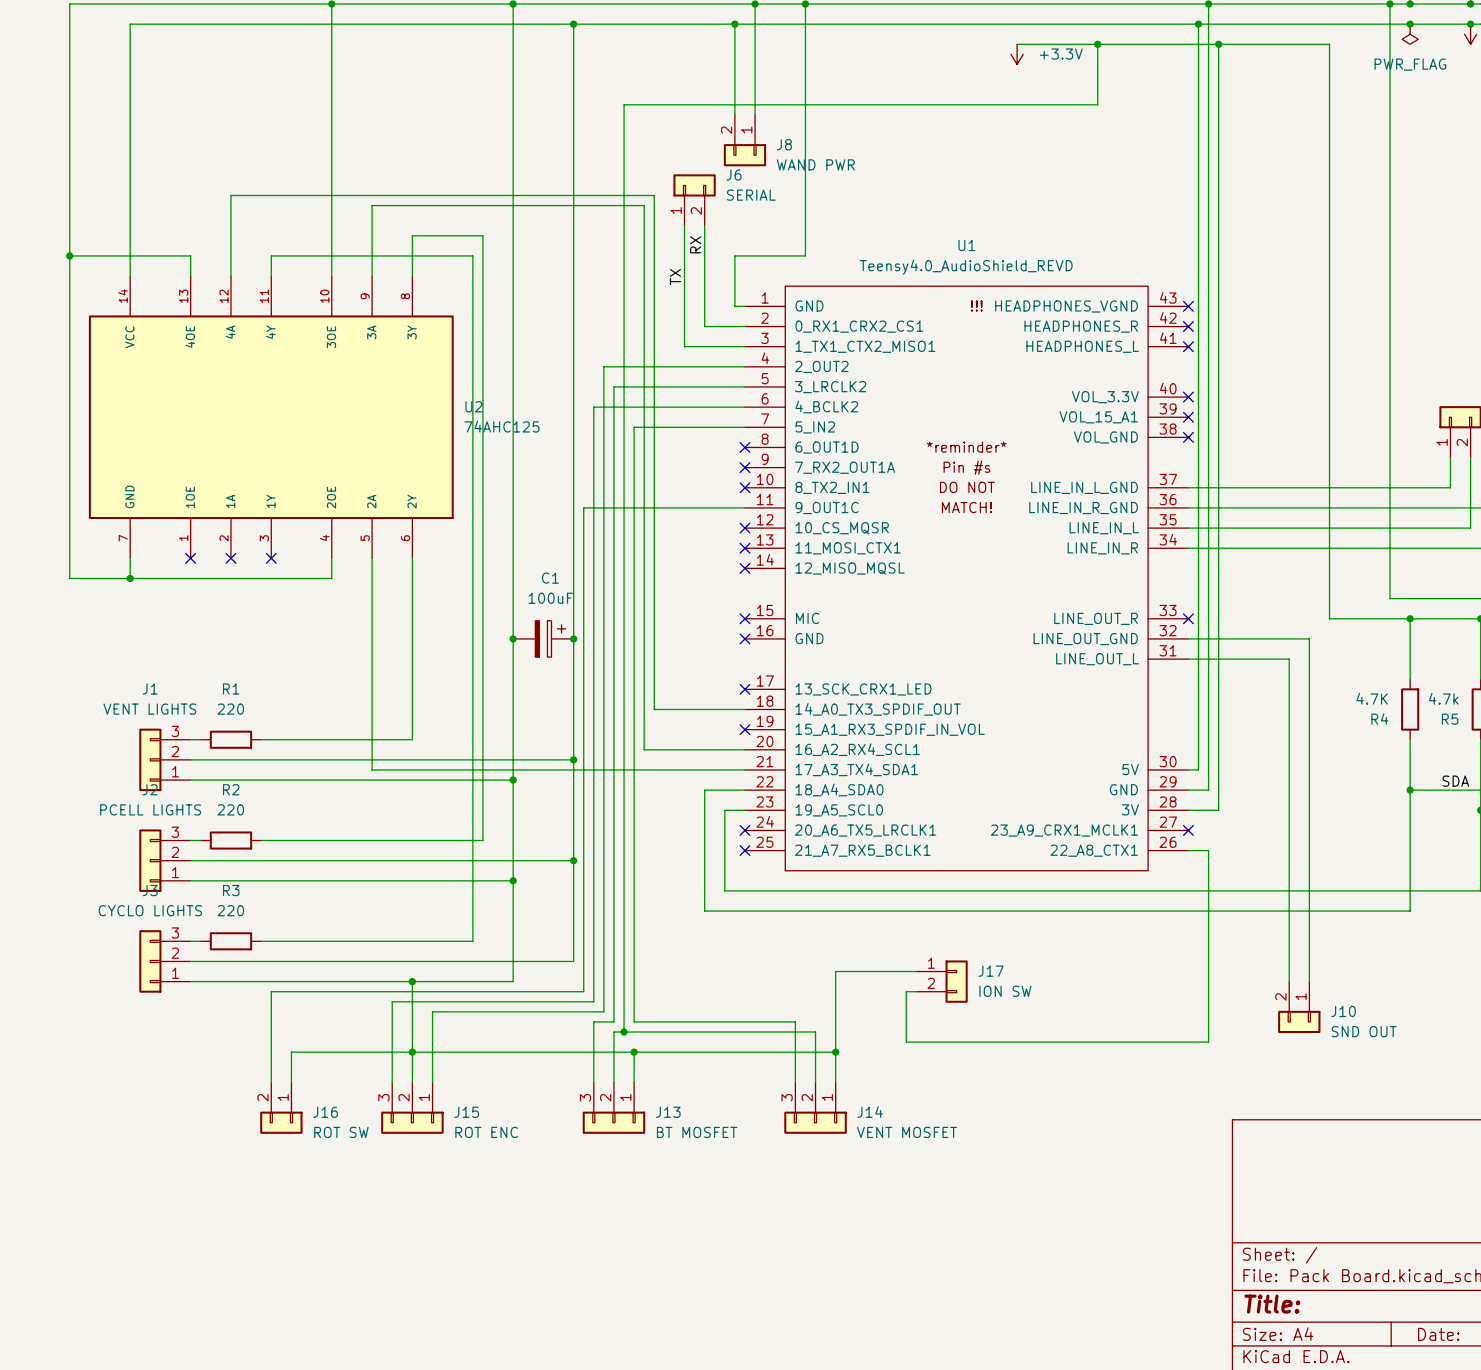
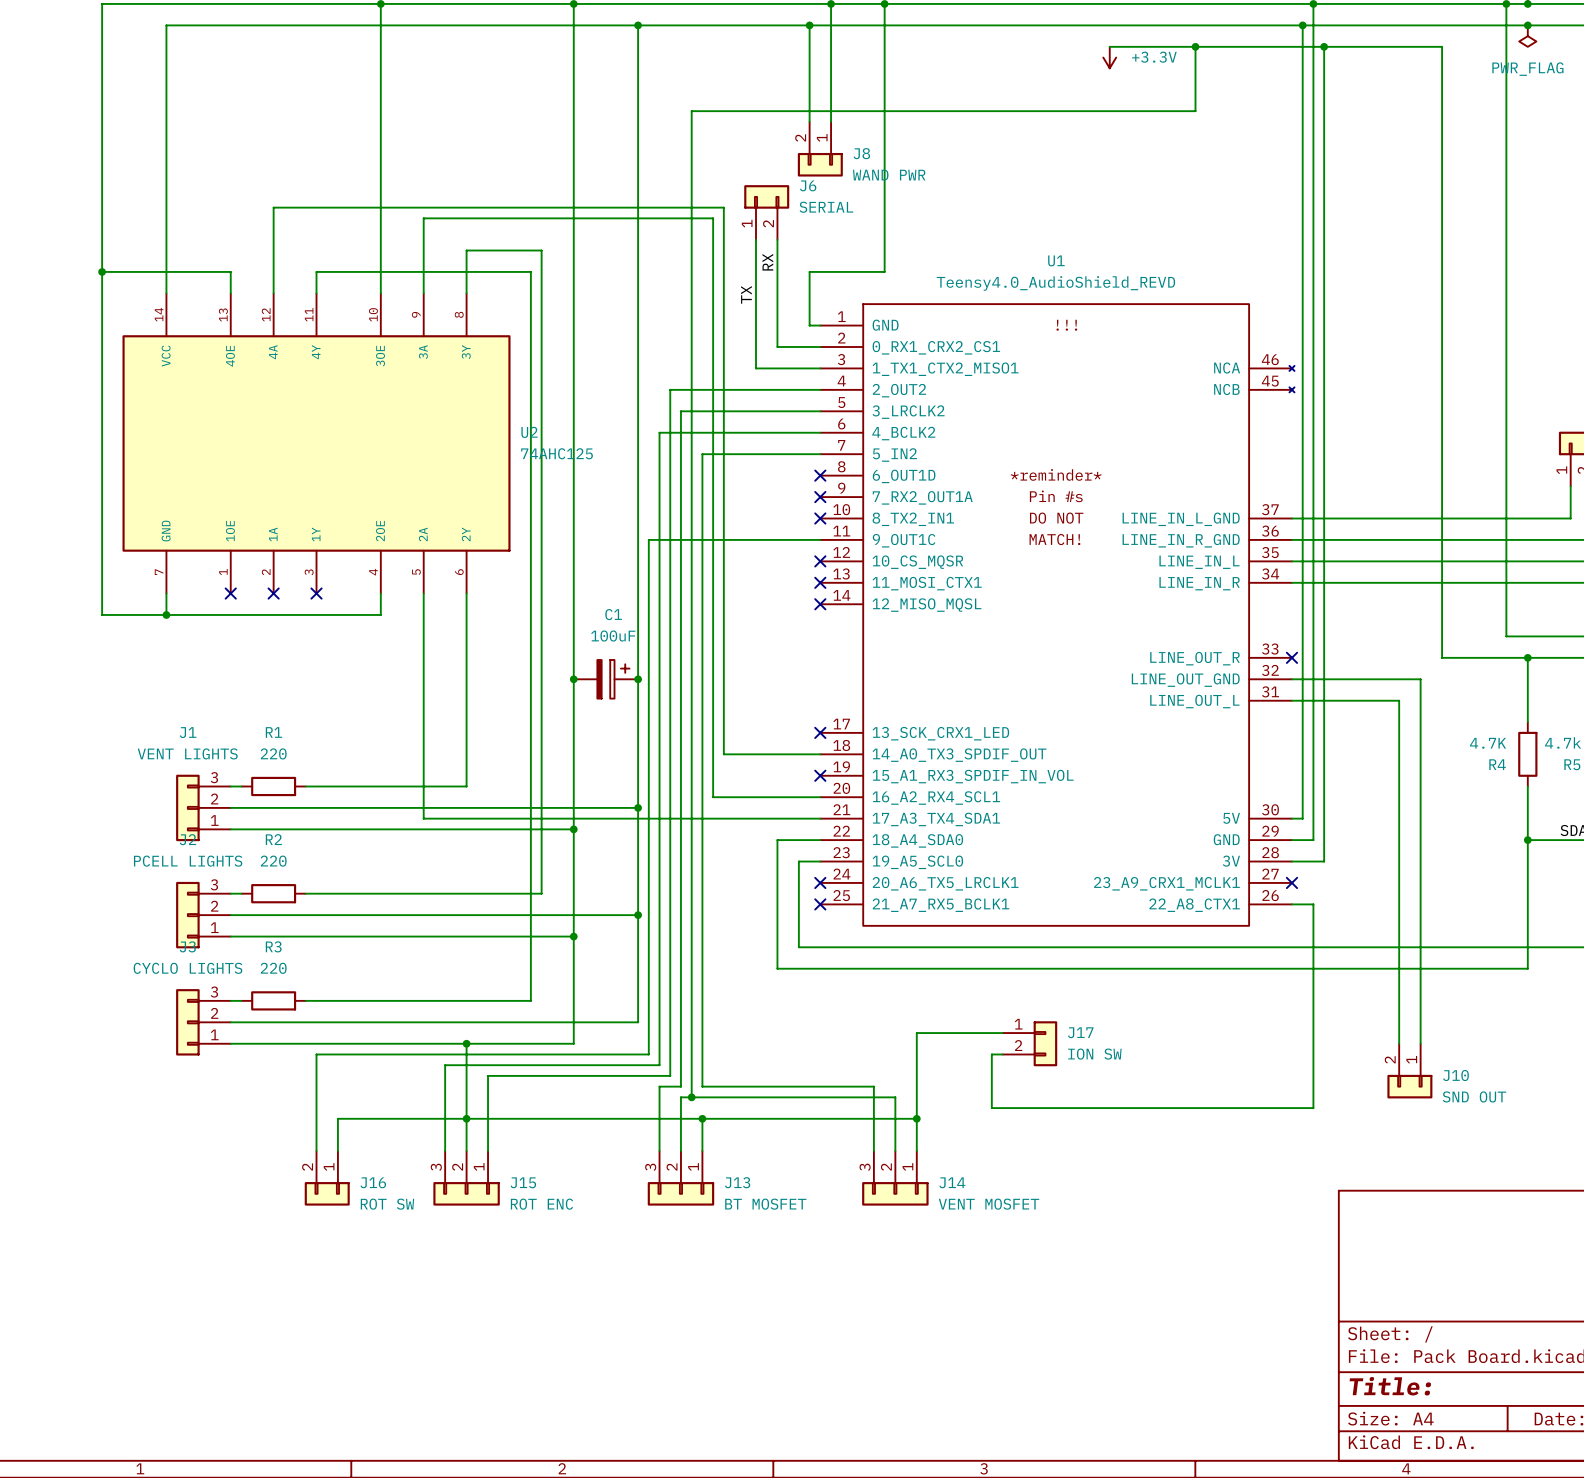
U1 symbol: [744, 286, 1189, 871] -> [820, 304, 1295, 926]
no-connect mark: (1188, 306) -> none
no-connect mark: (1188, 326) -> none
no-connect mark: (1188, 346) -> none
no-connect mark: (1188, 397) -> none
no-connect mark: (1188, 417) -> none
no-connect mark: (1188, 437) -> none
no-connect mark: (744, 618) -> none
no-connect mark: (744, 638) -> none

